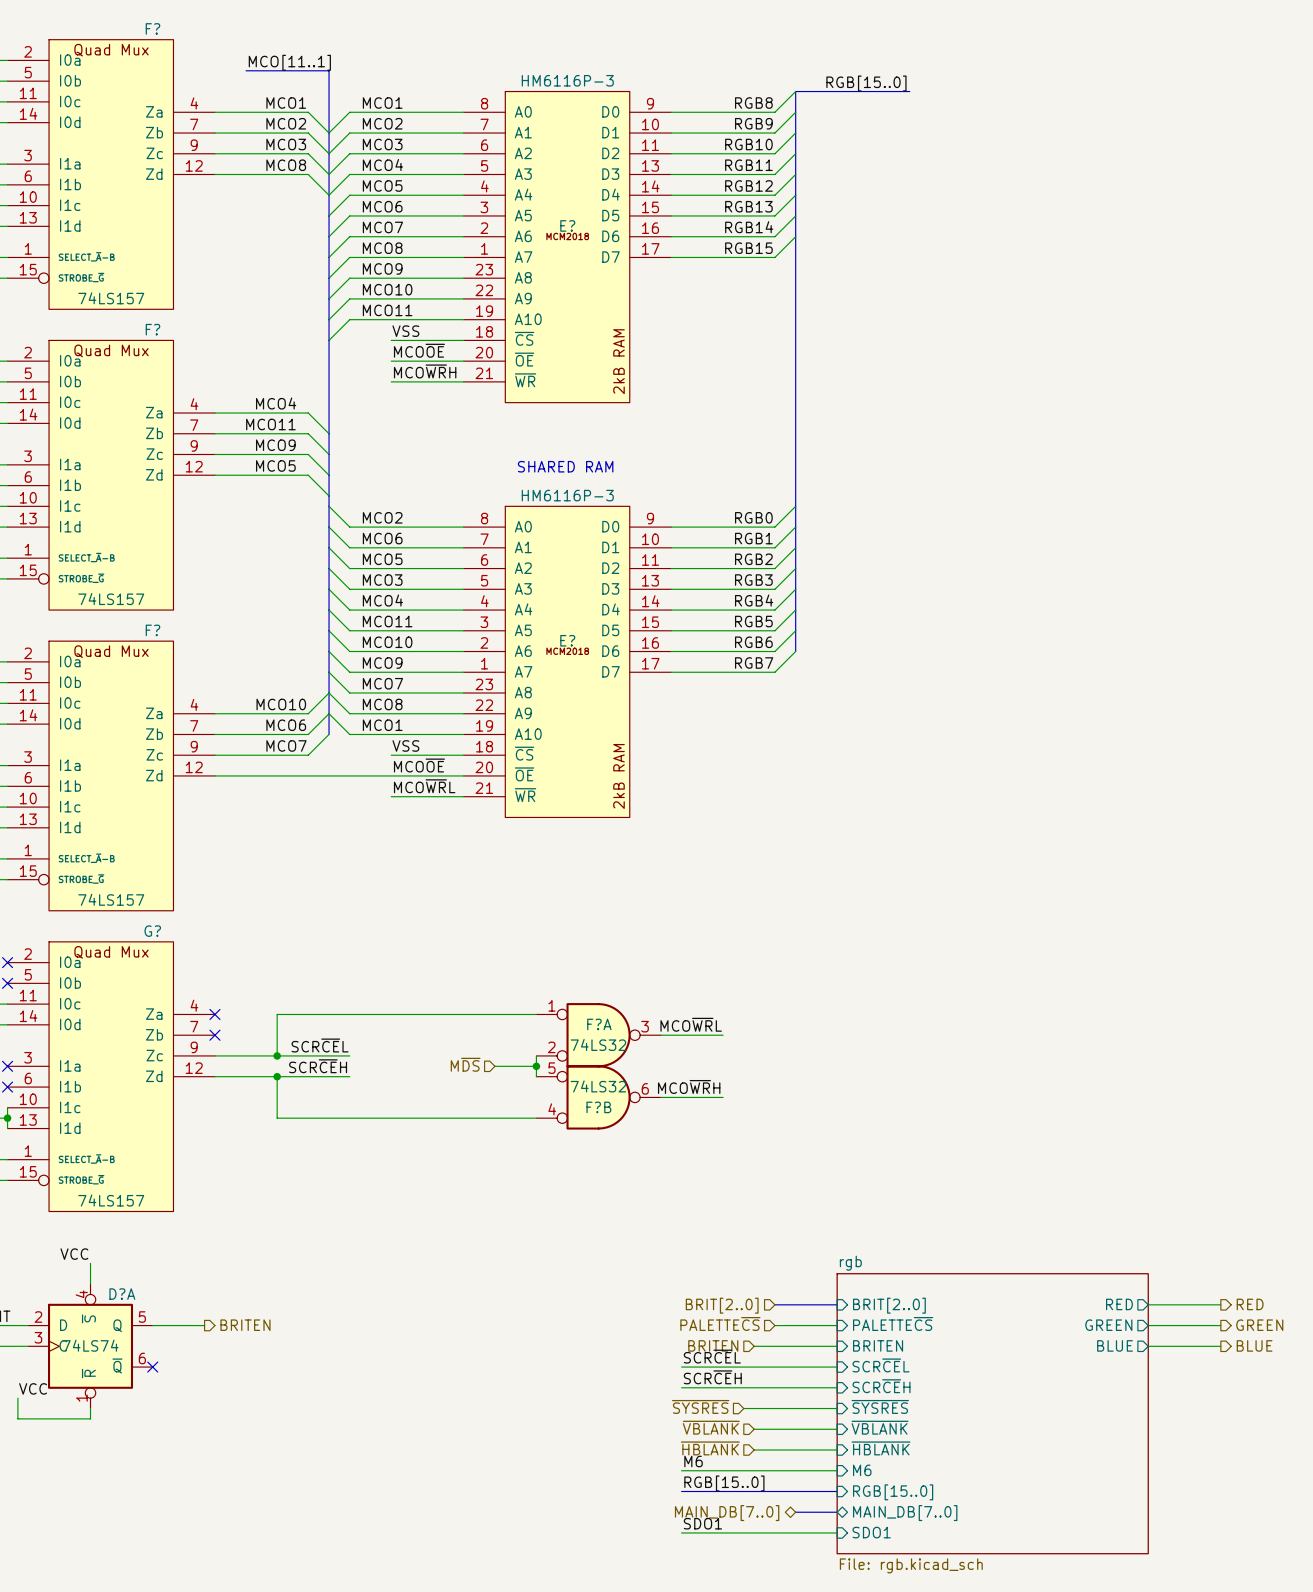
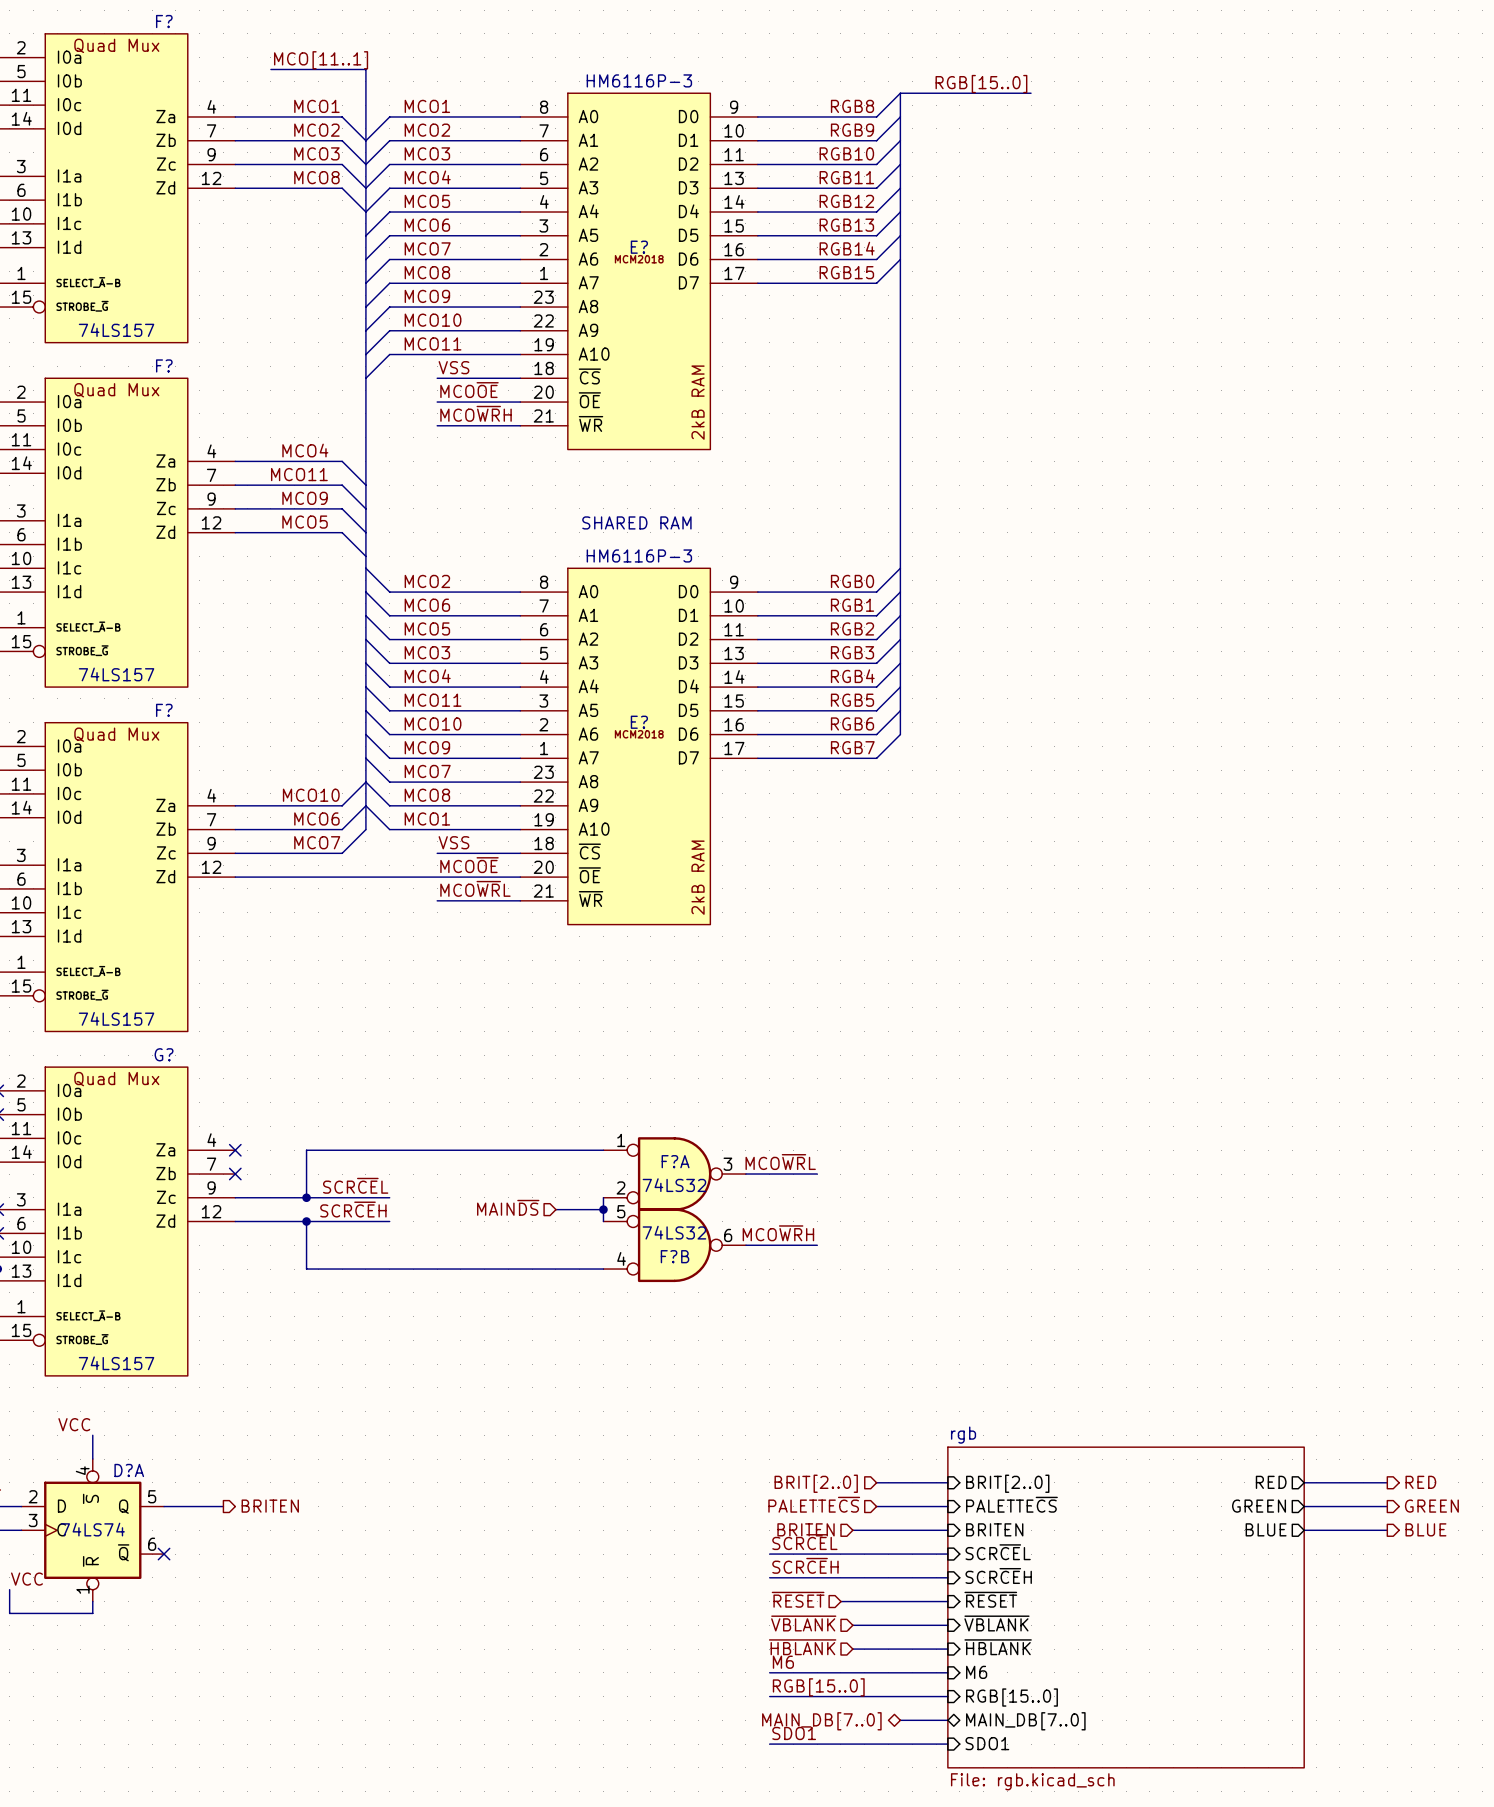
hierarchical label: M~{DS} (465, 1064) -> MAIN~{DS} (508, 1207)
hierarchical label: ~{SYSRES} (700, 1406) -> ~{RESET} (798, 1599)
sheet pin: ~{SYSRES} (880, 1406) -> ~{RESET} (990, 1599)

